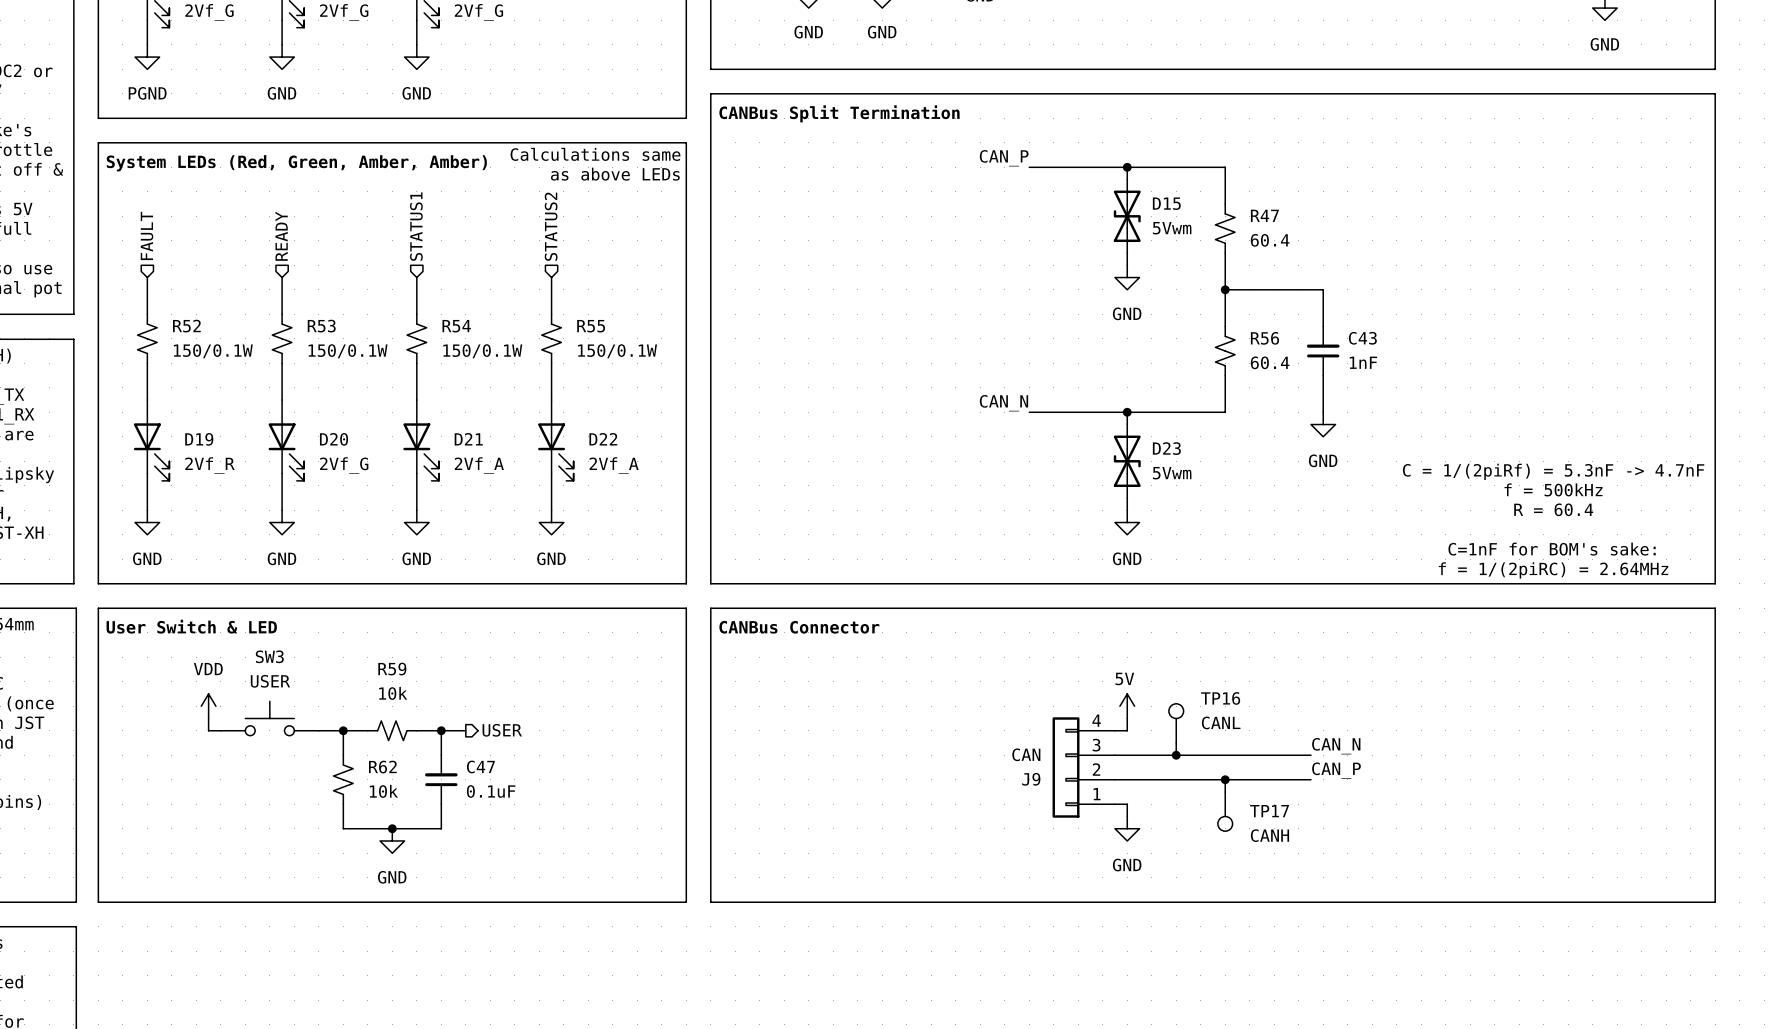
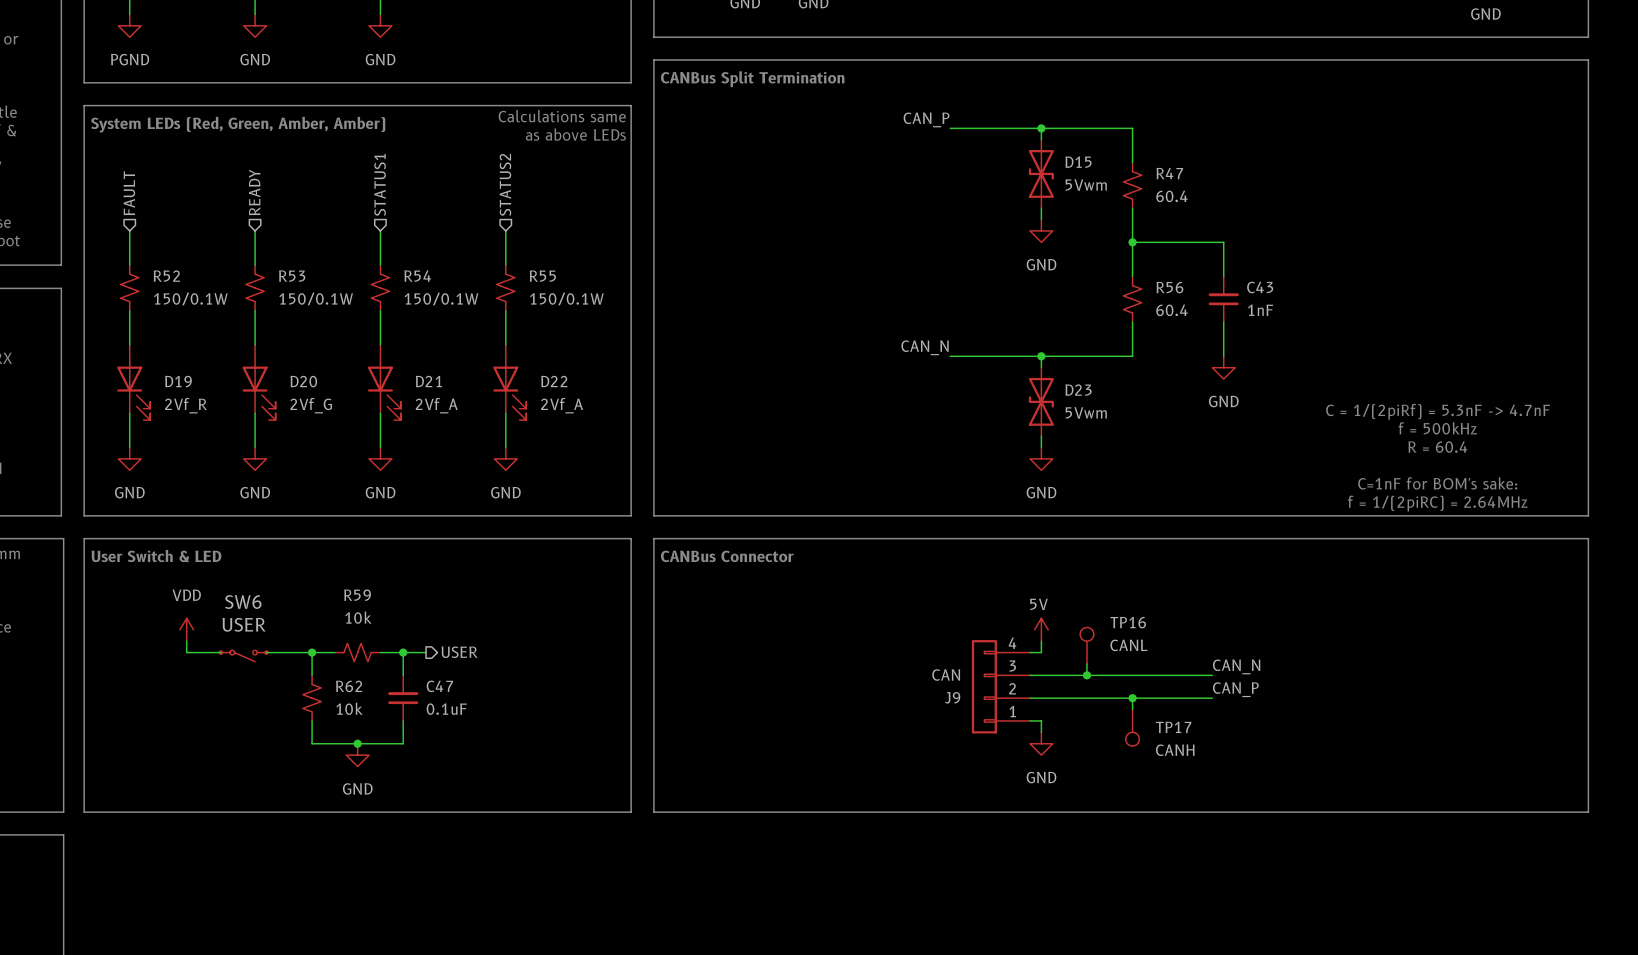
SW3: USER (269, 718) -> none
SW6: none -> USER (243, 656)

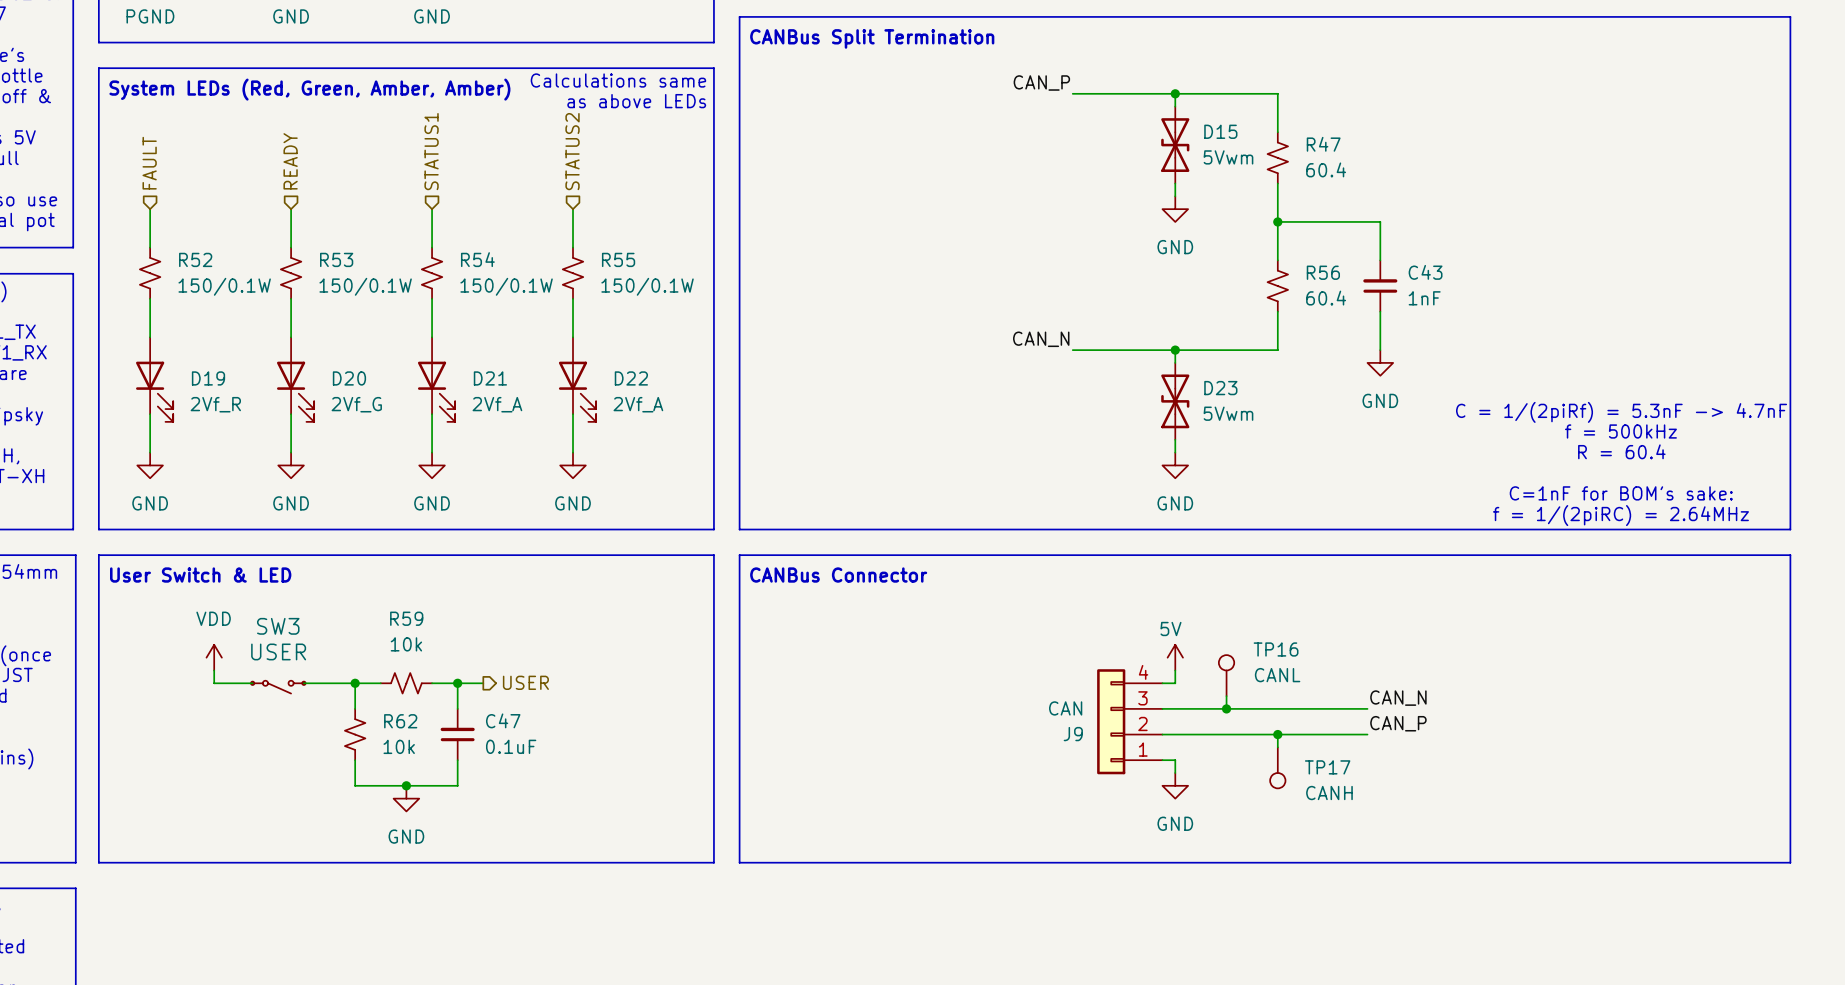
SW6 name: SW6 (243, 602) -> SW3 (278, 626)

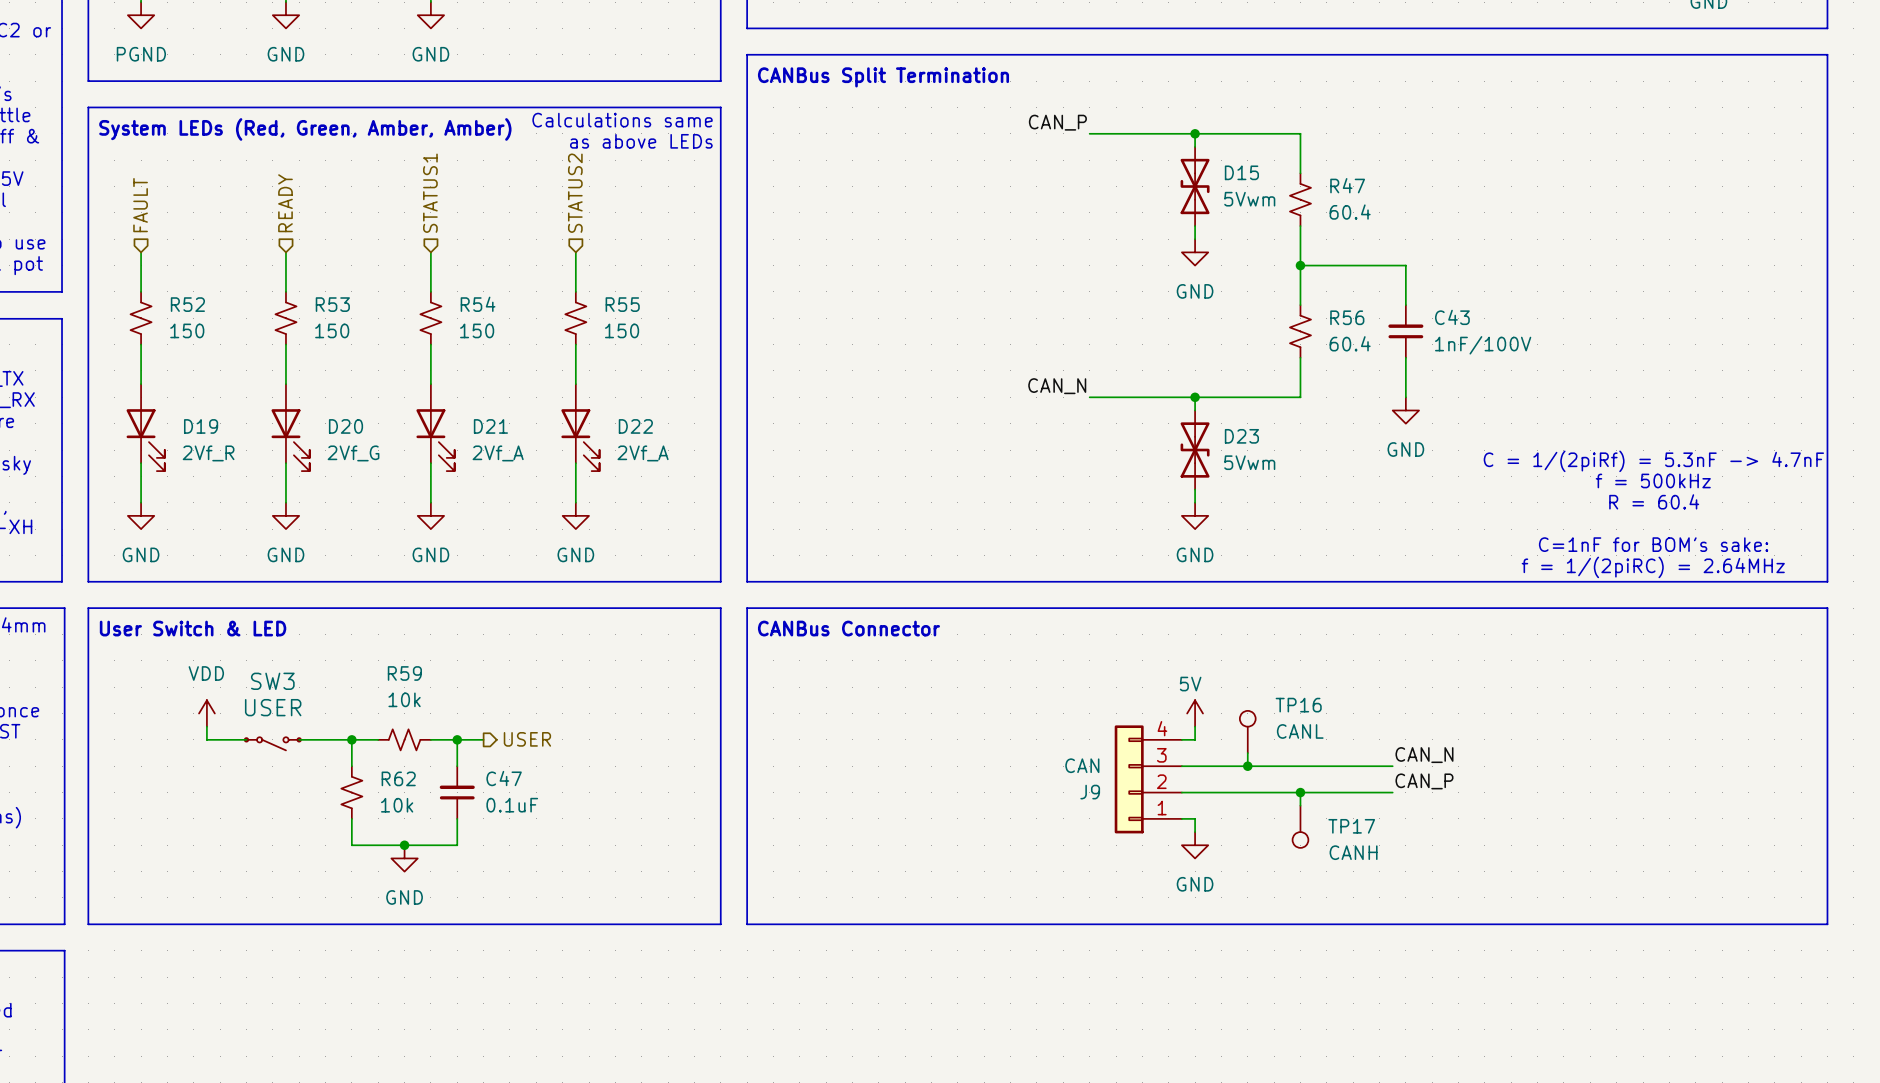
R52 value: 150/0.1W (224, 286) -> 150 (187, 330)
R53 value: 150/0.1W (365, 286) -> 150 (332, 330)
R54 value: 150/0.1W (506, 286) -> 150 (477, 330)
R55 value: 150/0.1W (647, 286) -> 150 (622, 330)
C43 value: 1nF (1424, 298) -> 1nF/100V (1483, 345)

